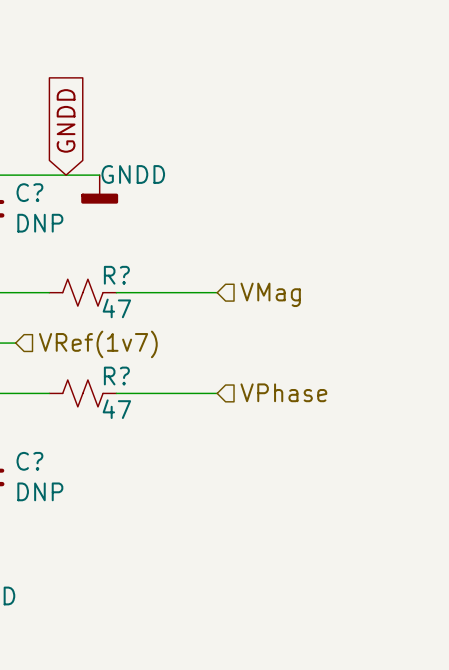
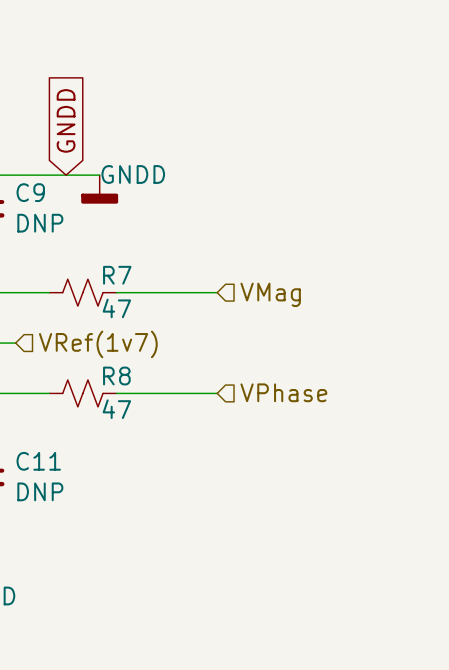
C? name: C? (29, 192) -> C9 (30, 192)
R? name: R? (116, 275) -> R7 (117, 275)
R? name: R? (116, 376) -> R8 (116, 376)
C? name: C? (29, 461) -> C11 (38, 461)

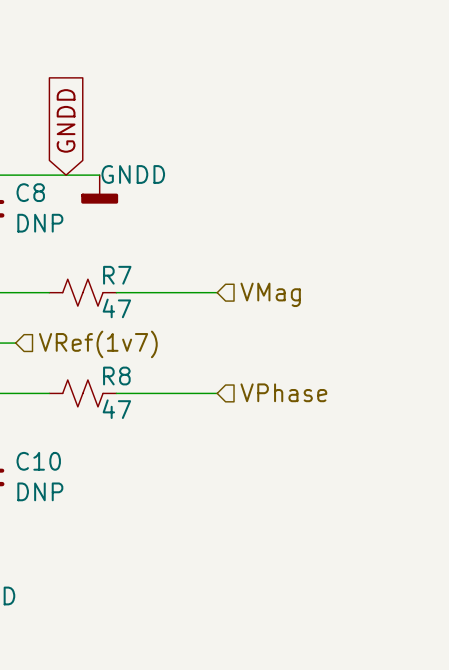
C9 name: C9 (30, 192) -> C8 (30, 192)
C11 name: C11 (38, 461) -> C10 (38, 461)

